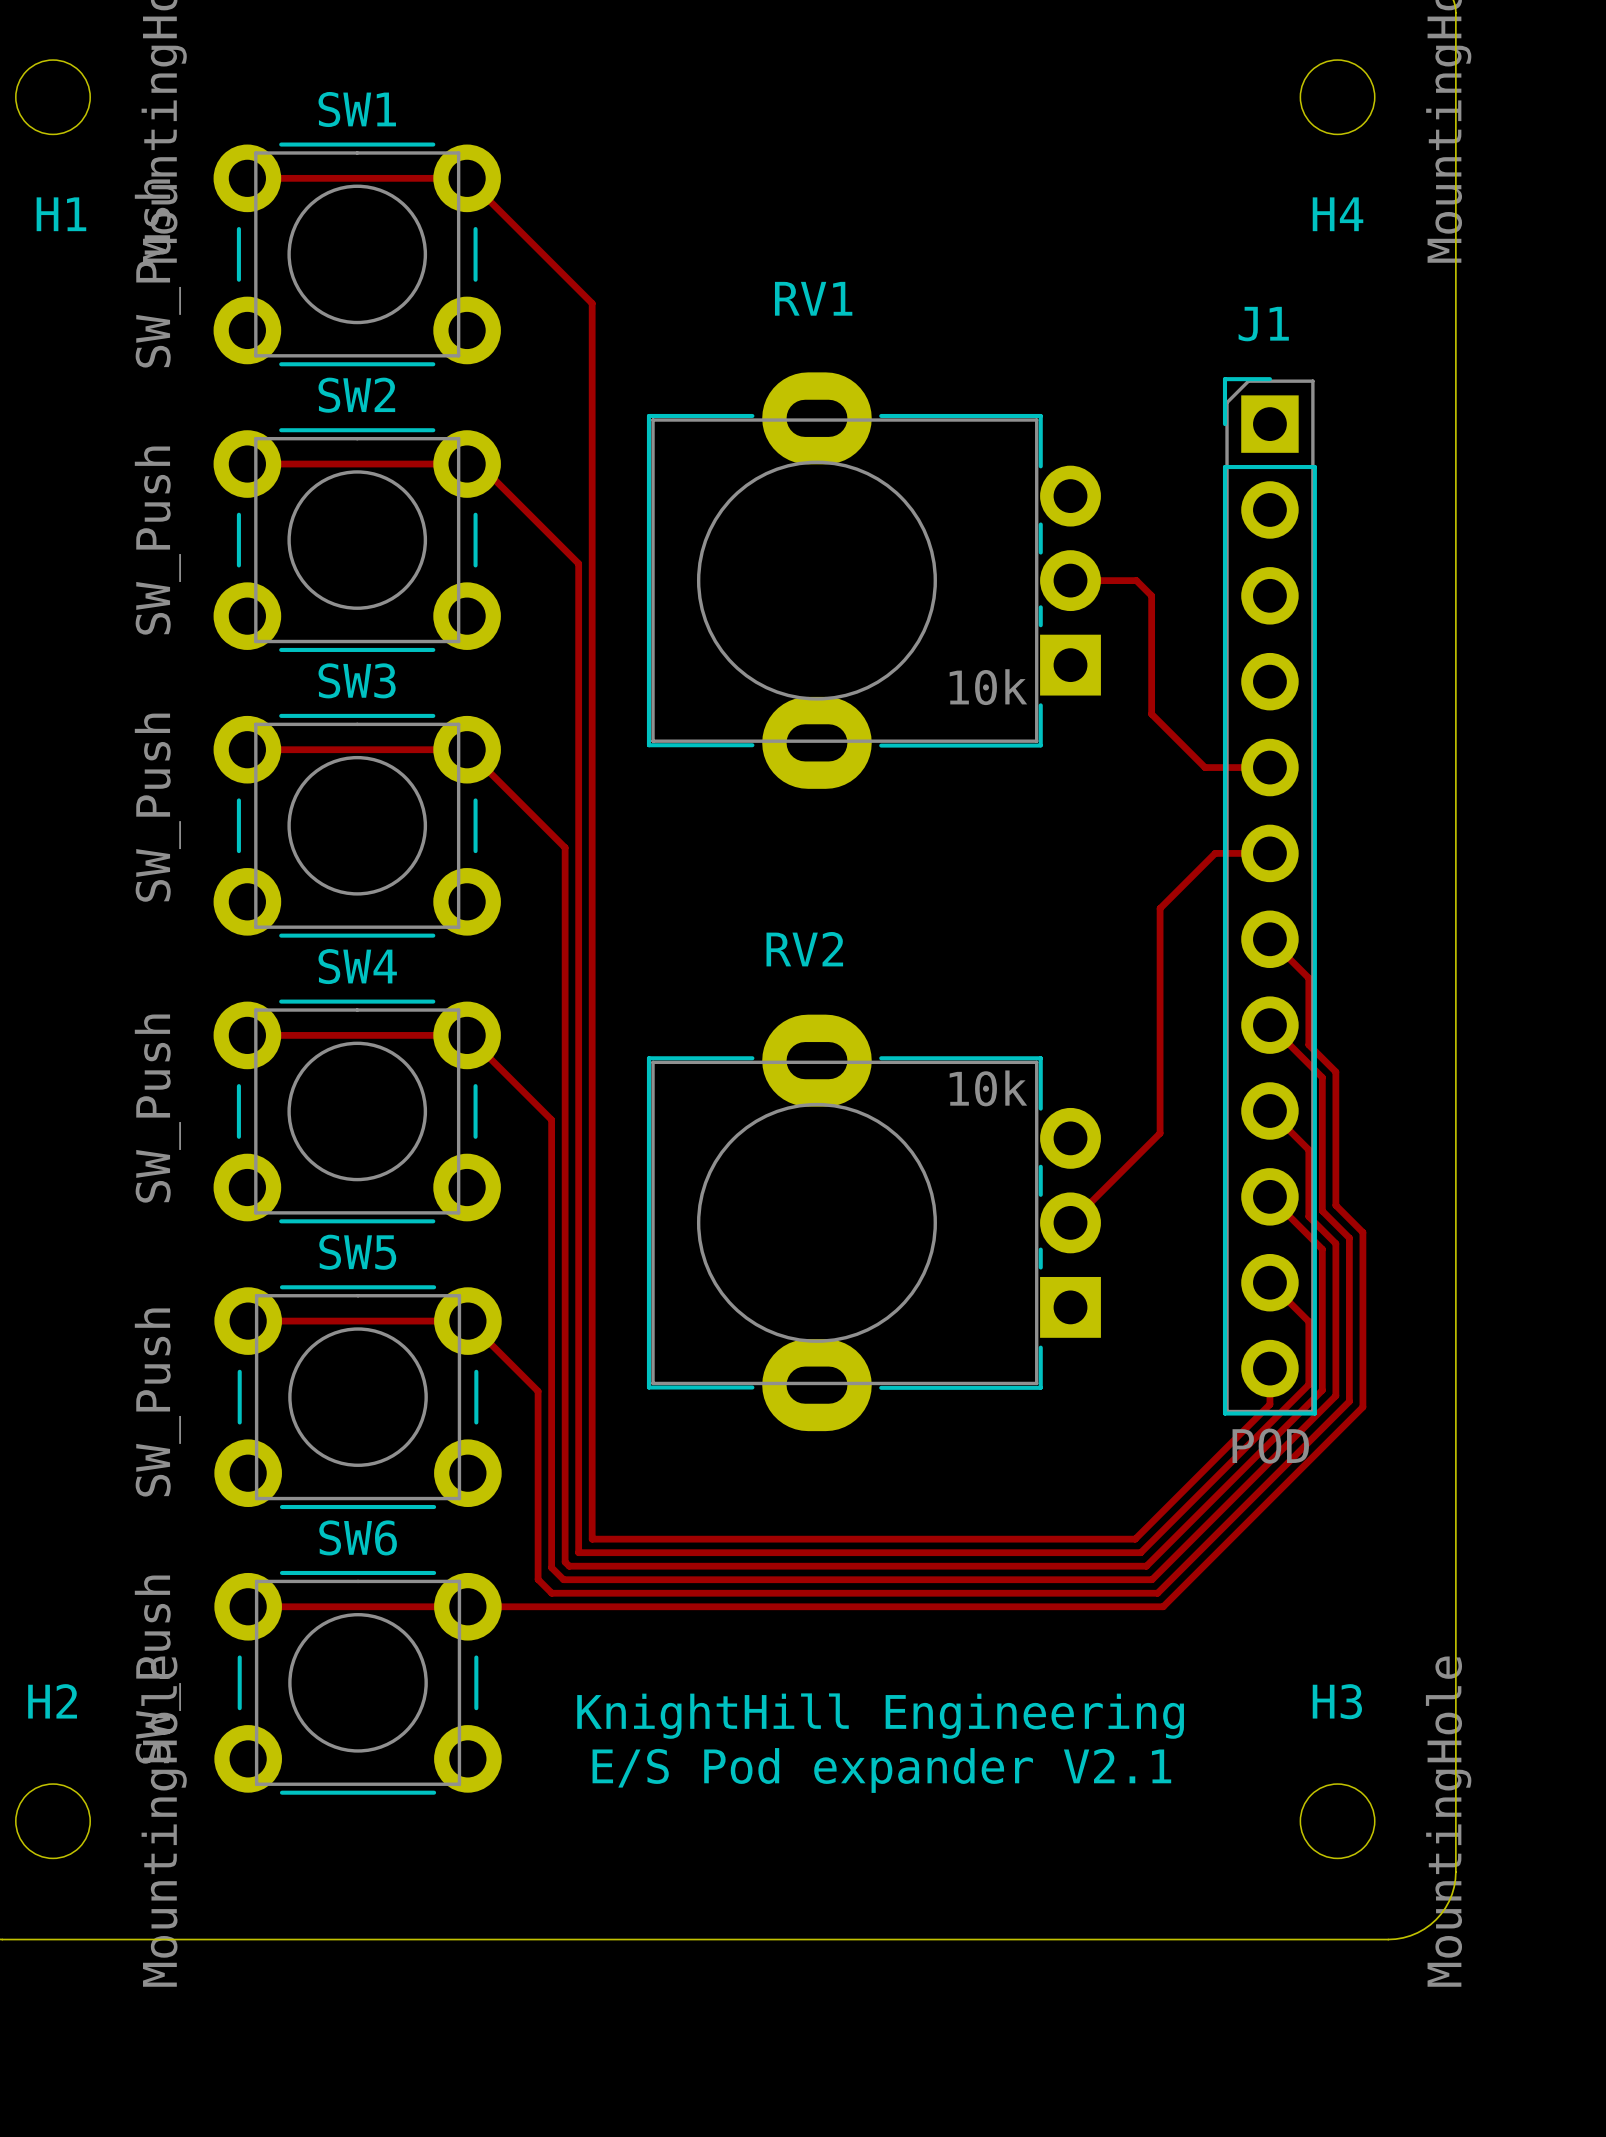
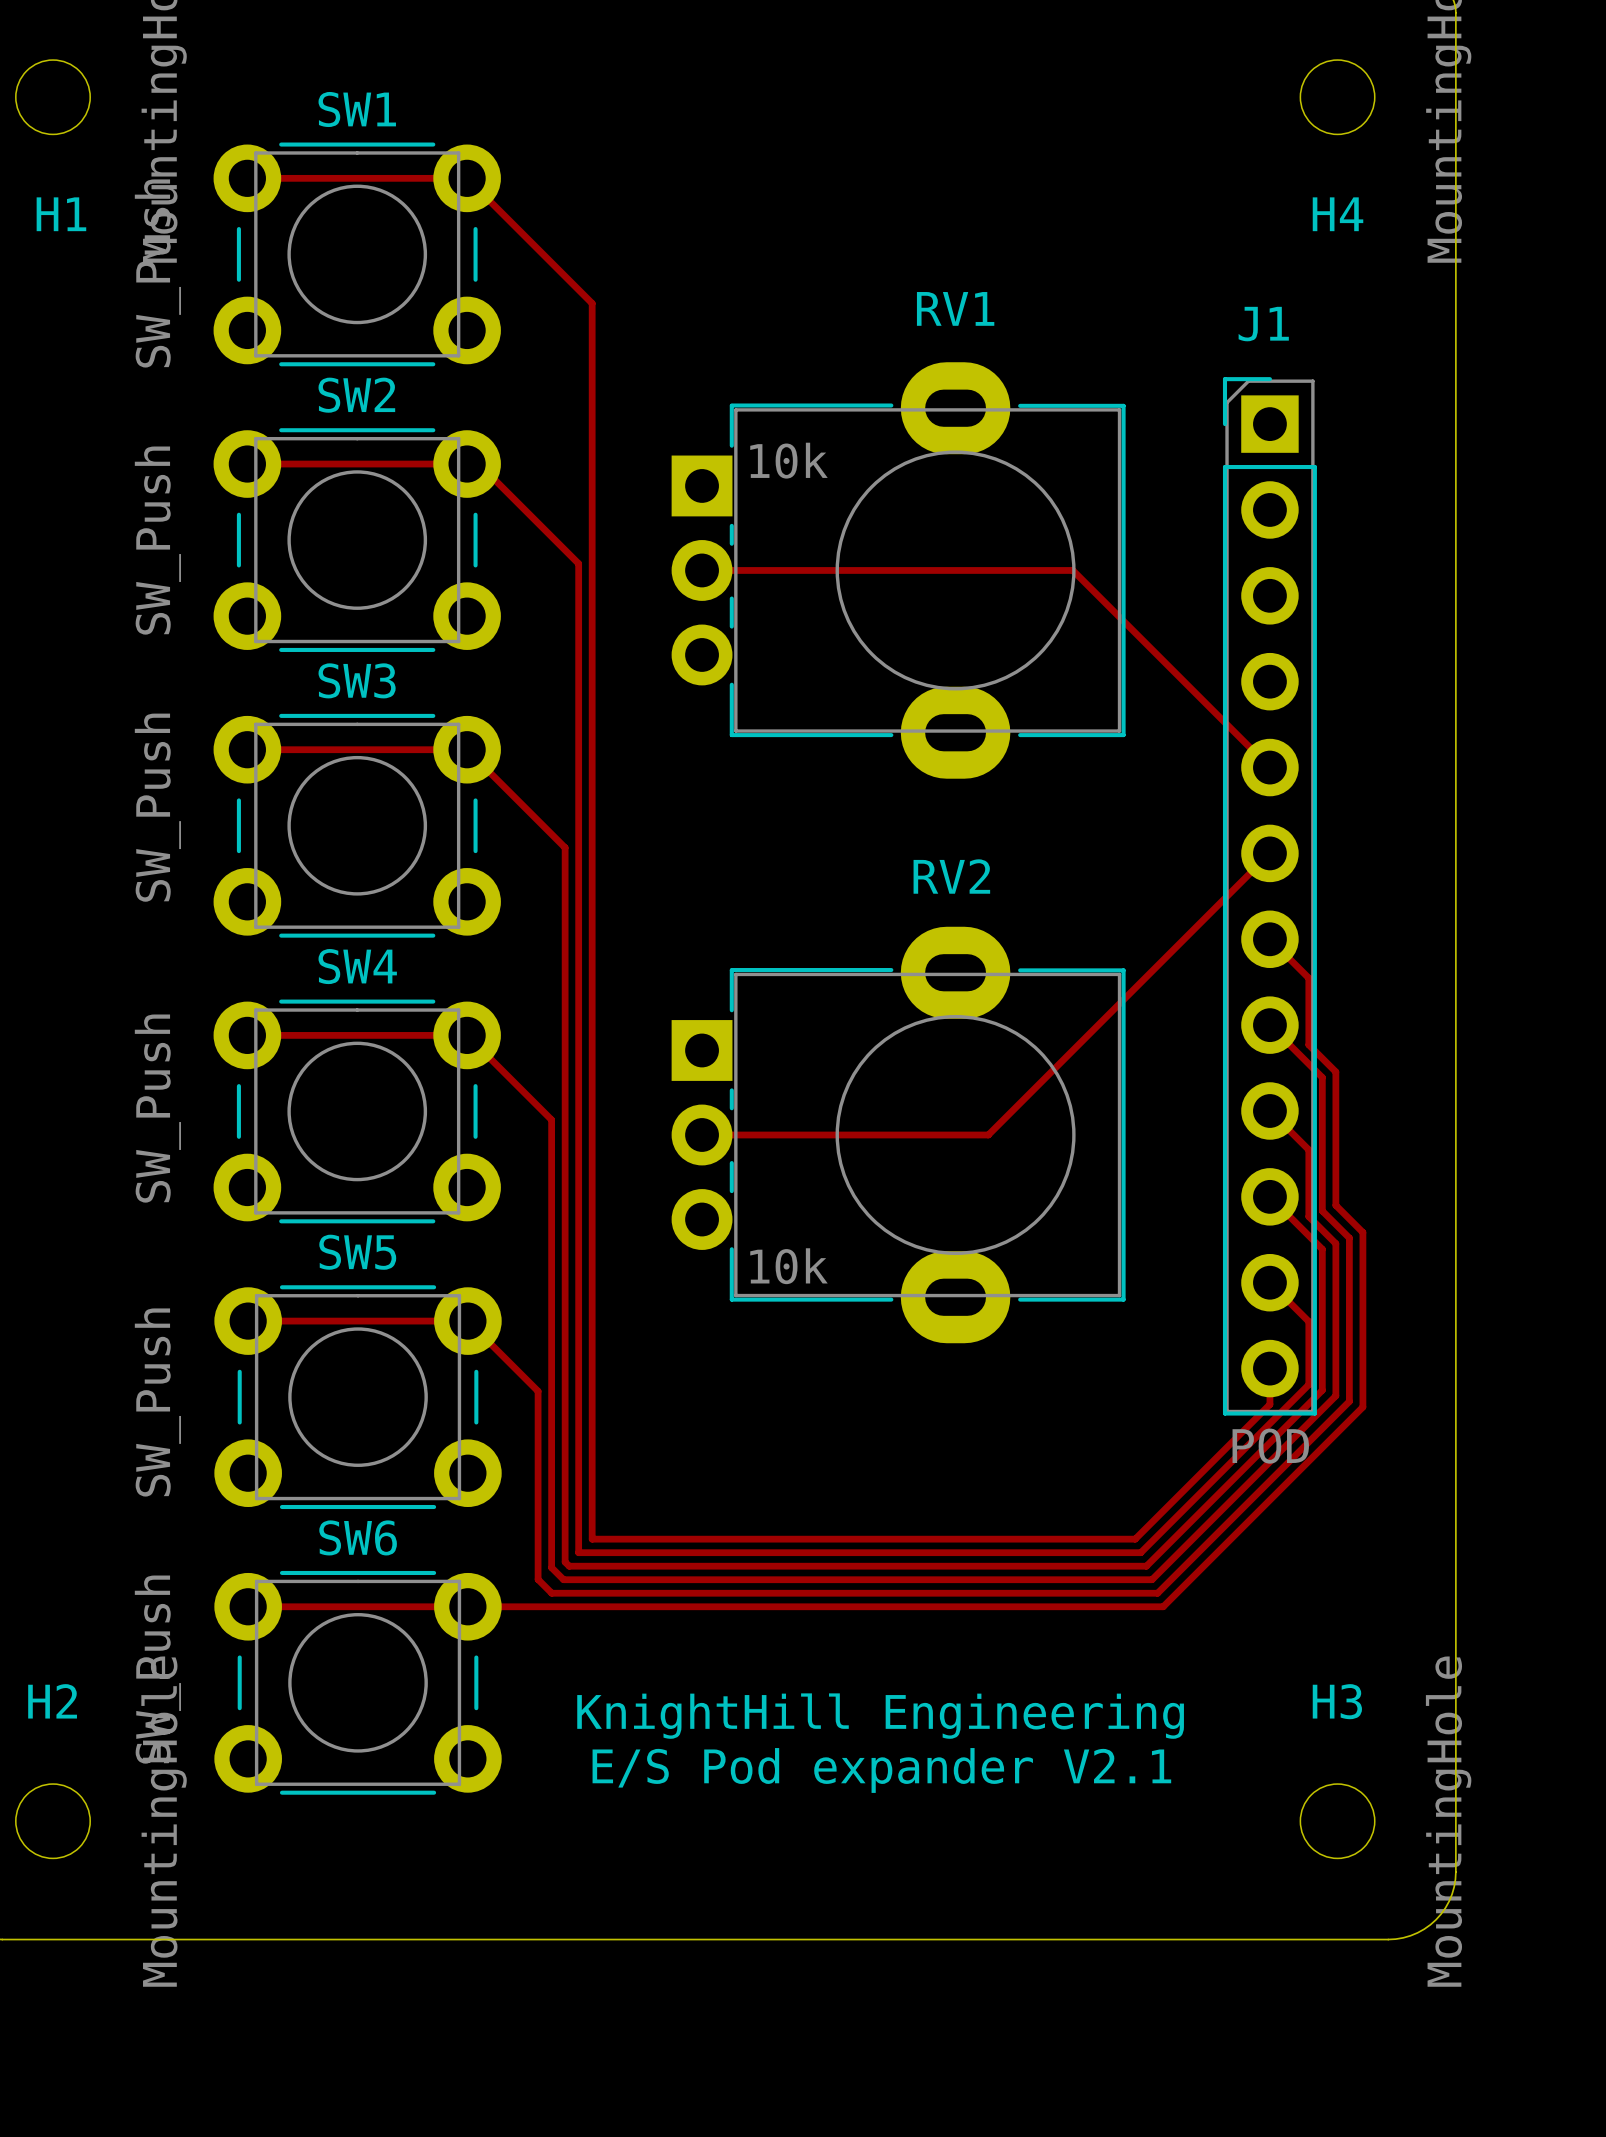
RV1 name position: RV1 (813, 298) -> RV1 (955, 308)
RV1 rotation: 0° (873, 580) -> 180° (898, 570)
top track: (1070, 580) (1136, 580) (1151, 595) (1151, 714) (1205, 767) (1269, 767) -> (702, 570) (1072, 570) (1269, 767)
top track: (1269, 853) (1215, 853) (1160, 908) (1160, 1133) (1070, 1222) -> (1269, 853) (988, 1135) (702, 1135)
RV2 name position: RV2 (804, 949) -> RV2 (951, 876)
RV2 rotation: 0° (873, 1222) -> 180° (898, 1135)

